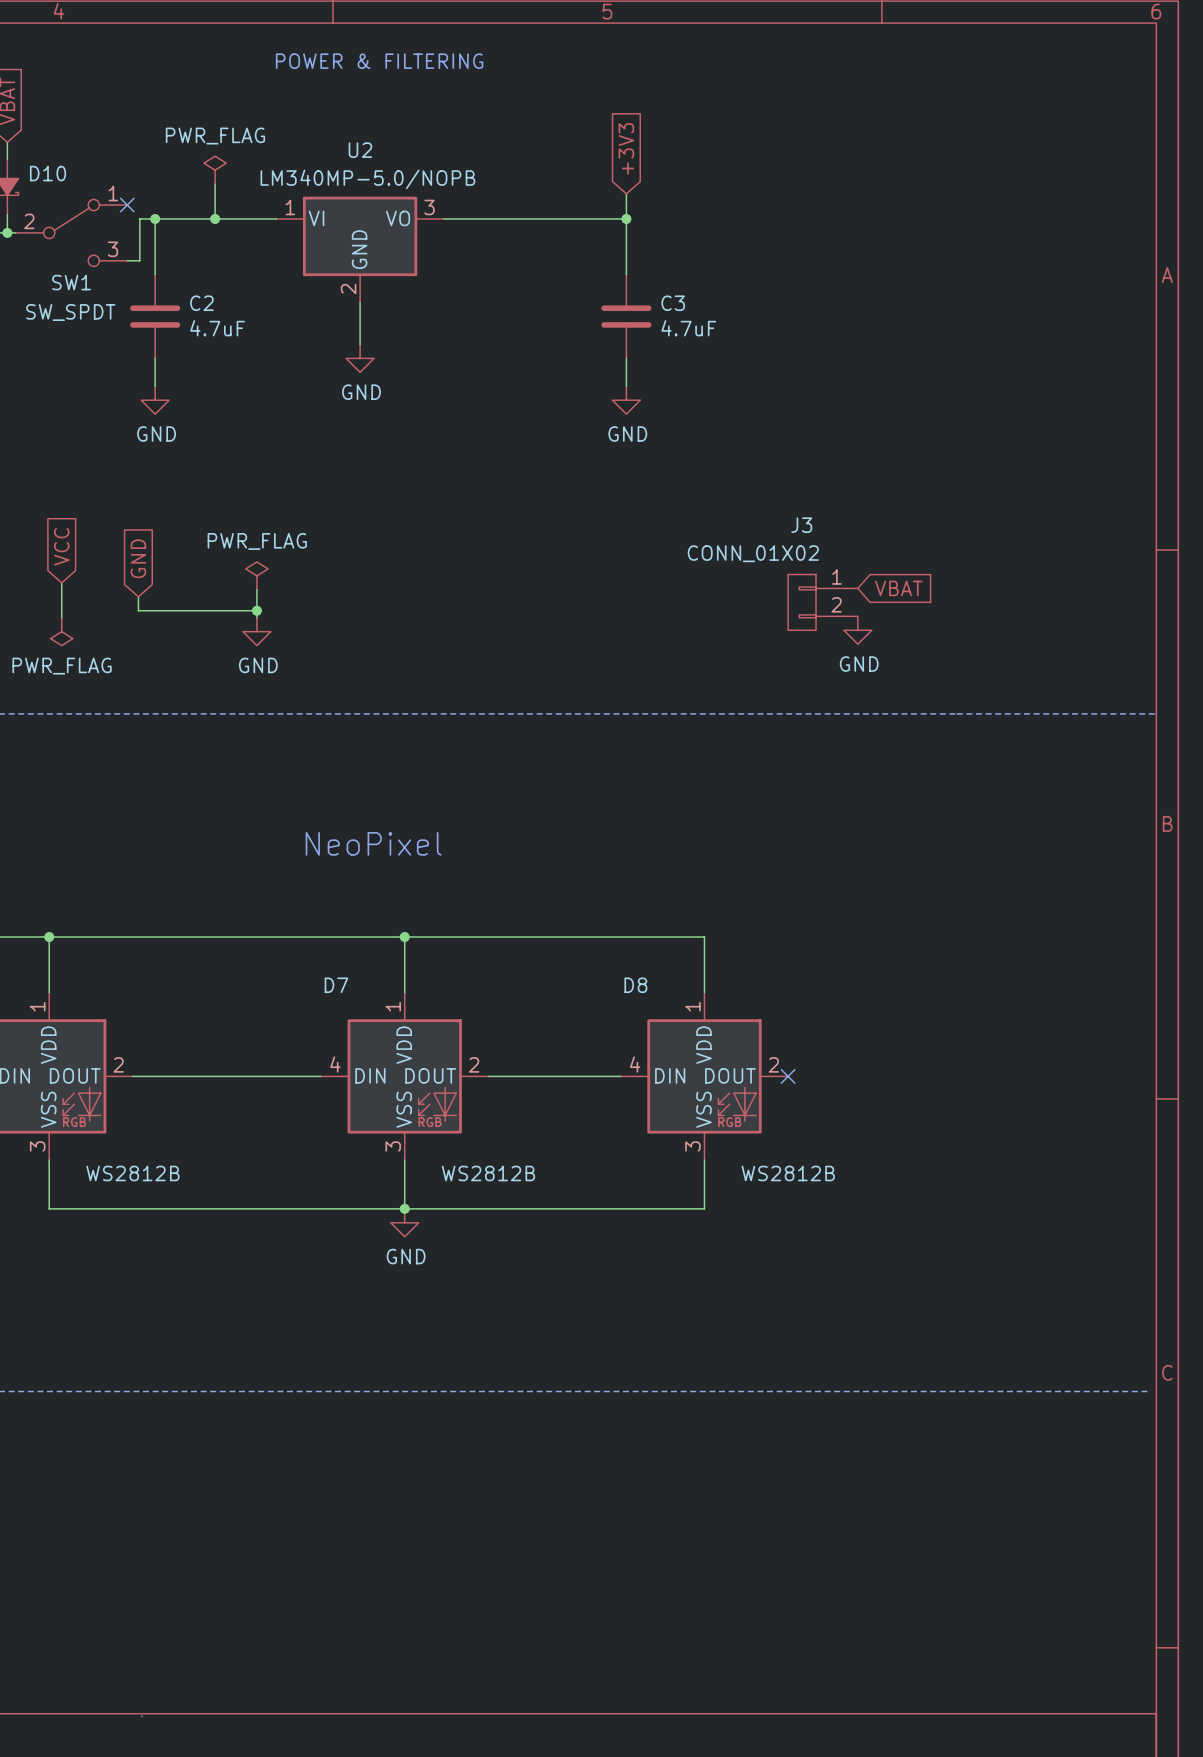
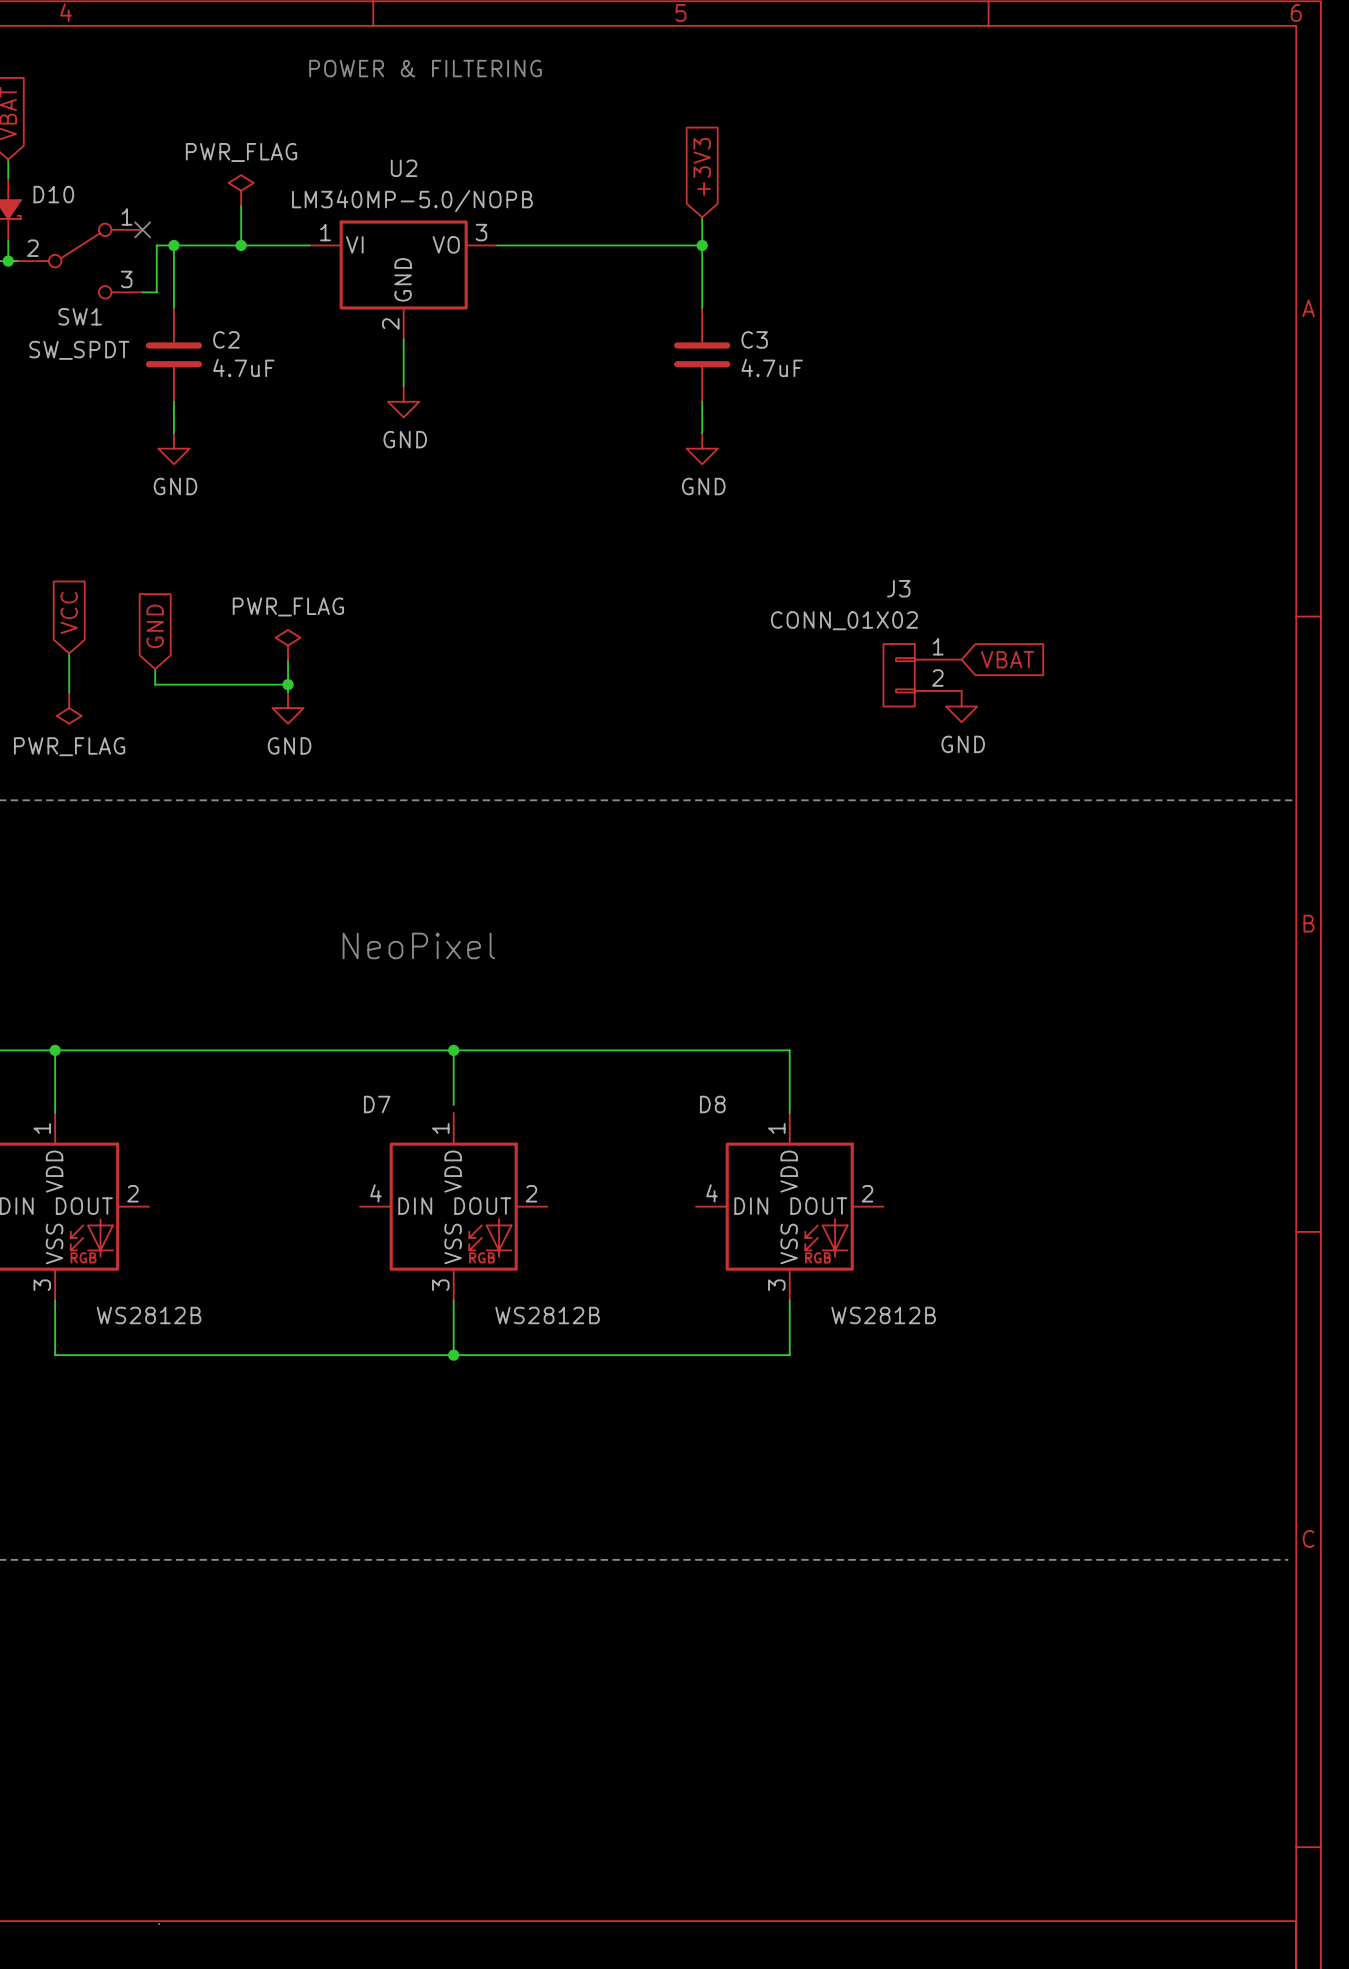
wire: (404, 985) (404, 992) -> none
wire: (132, 1076) (321, 1076) -> none
wire: (488, 1076) (620, 1076) -> none
no-connect mark: (788, 1076) -> none
power symbol: GND (404, 1222) -> none

